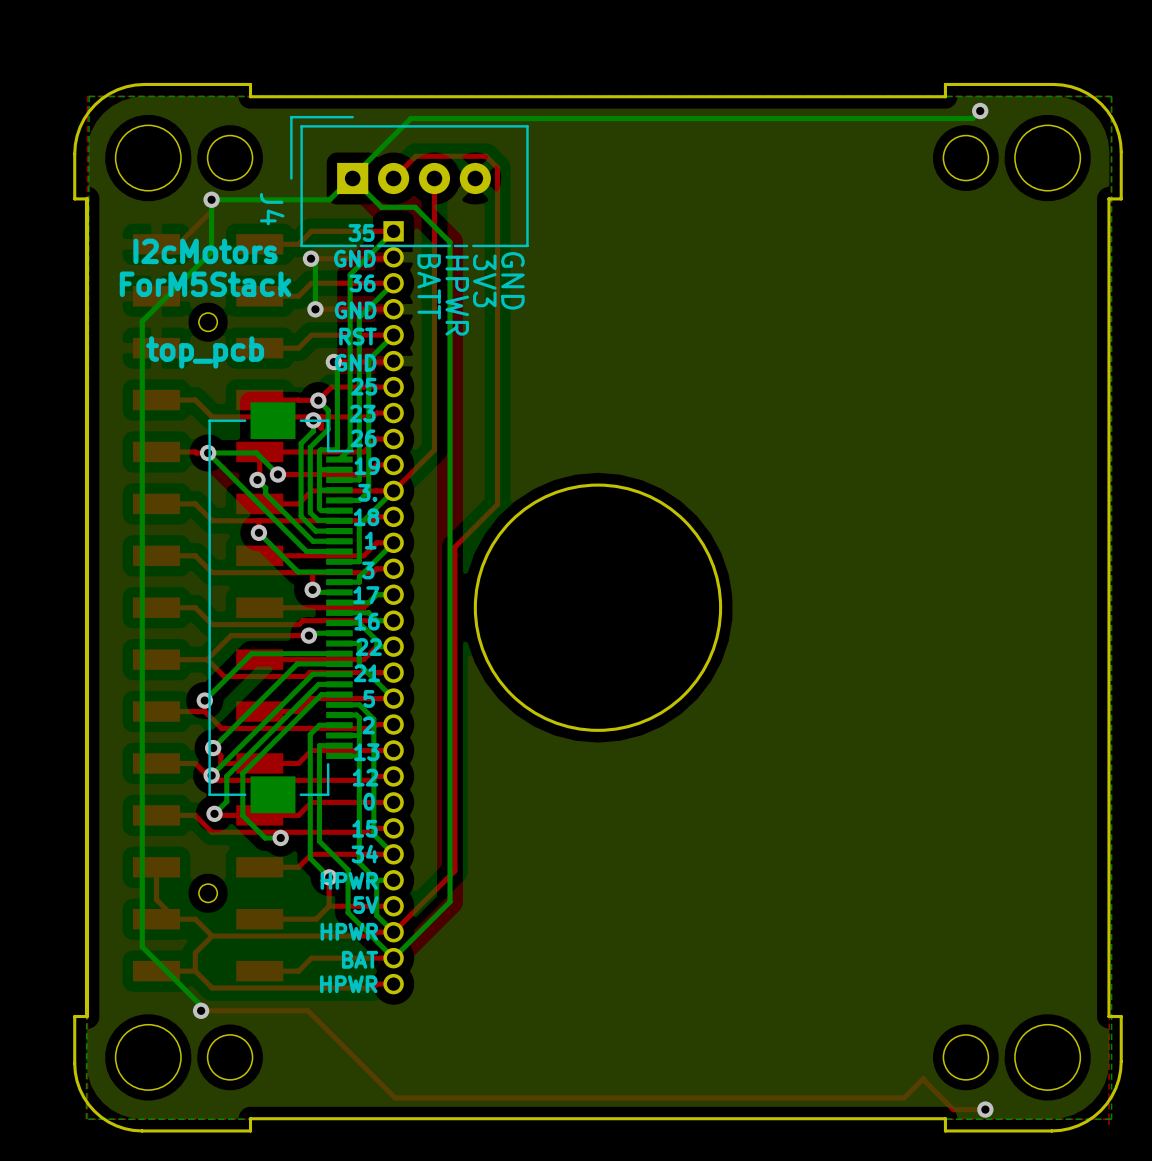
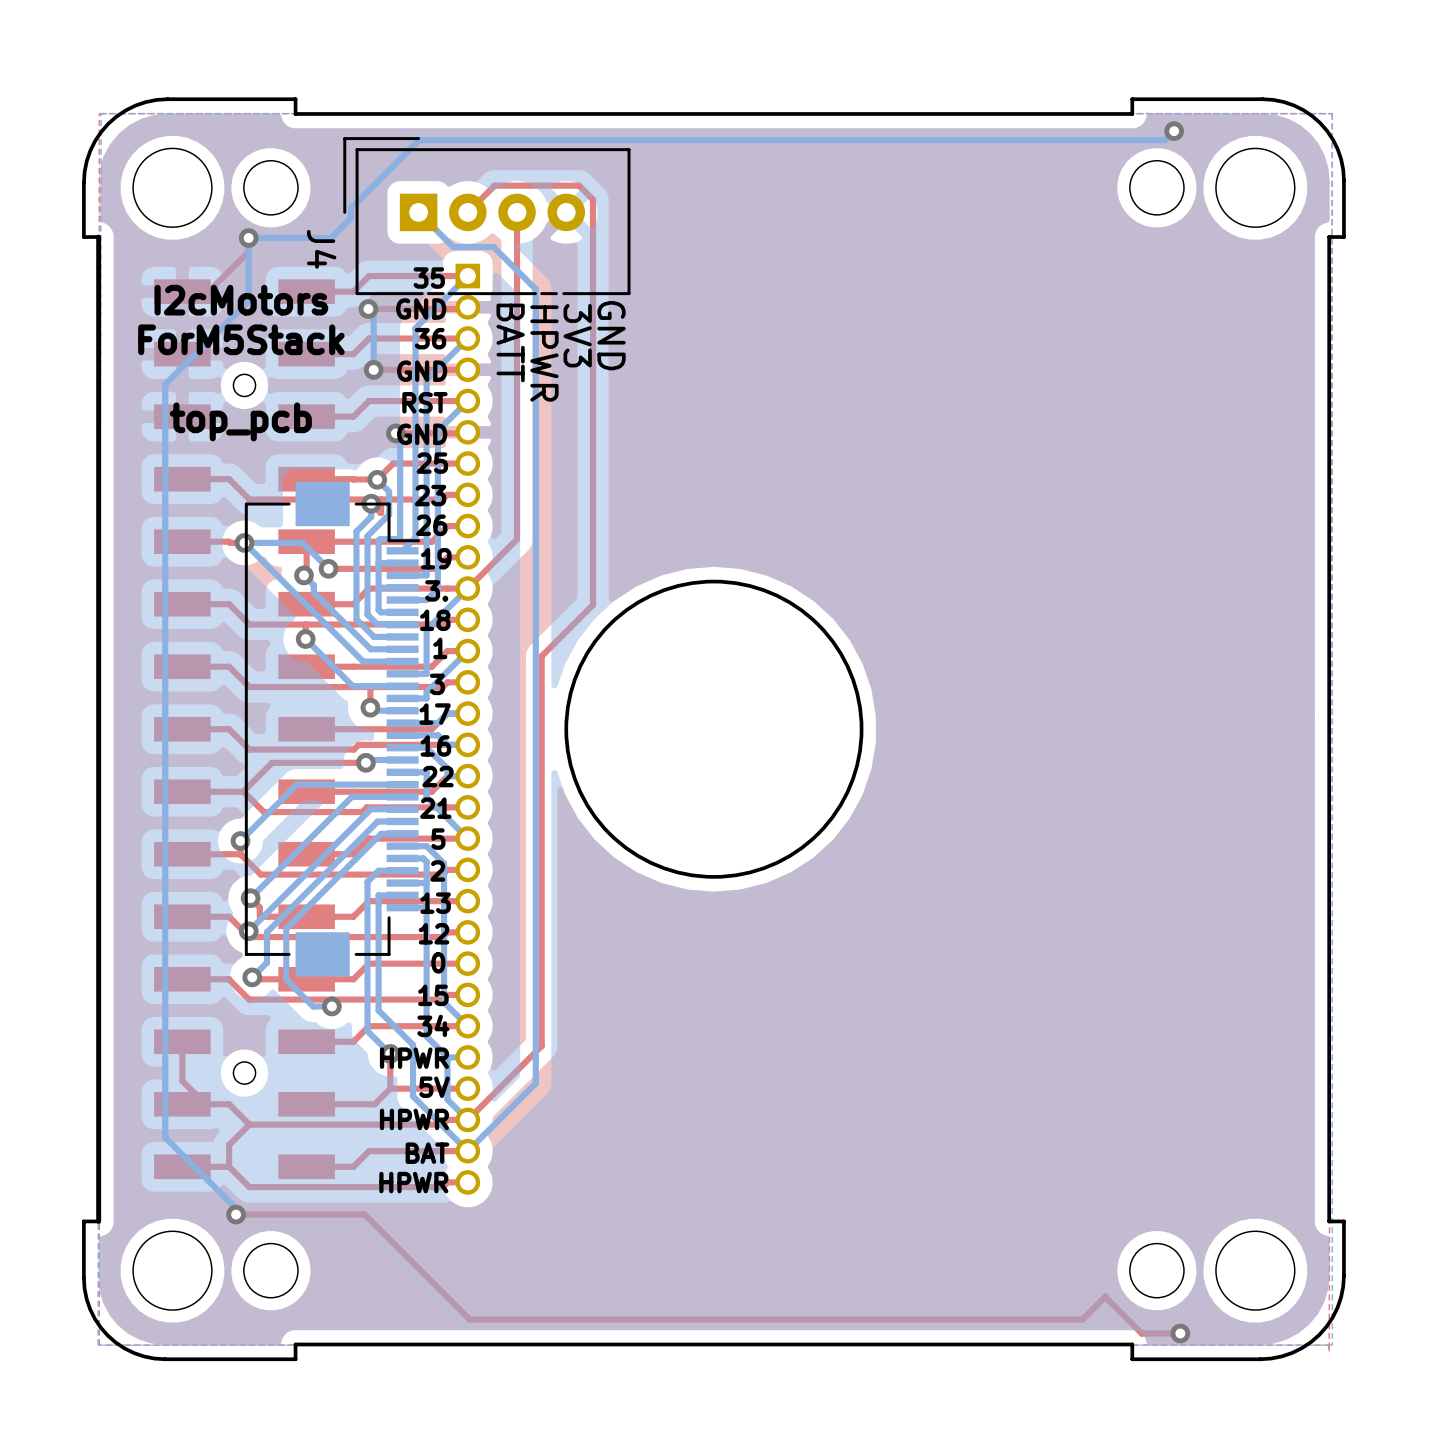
bottom track: (410, 118) (329, 199) (280, 199) -> (488, 140) (419, 140) (350, 208) (350, 218) (331, 238)

